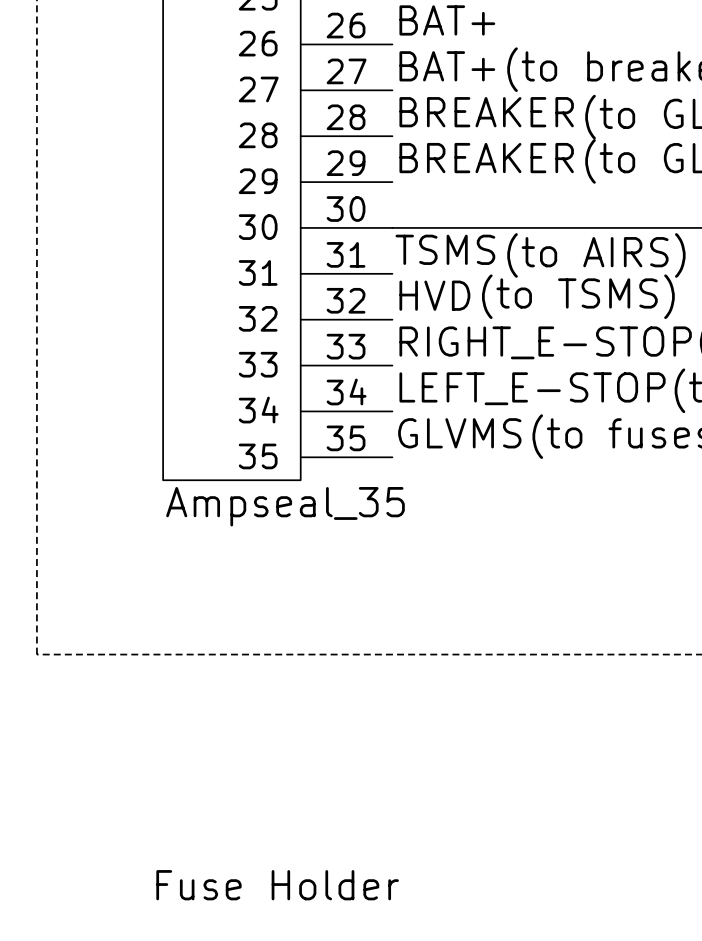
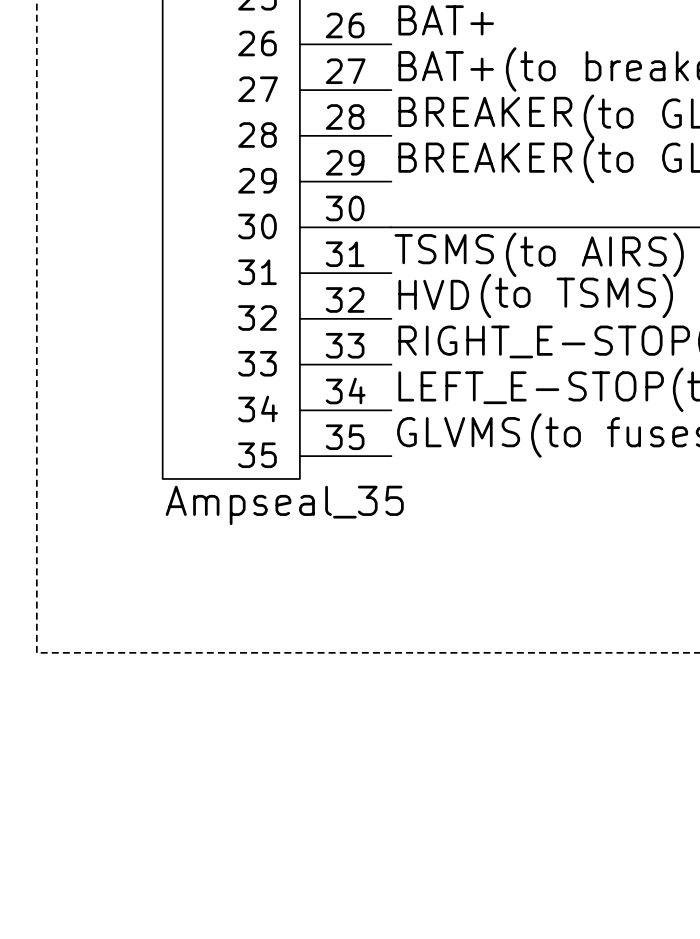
text: Fuse Holder (277, 885) -> none

